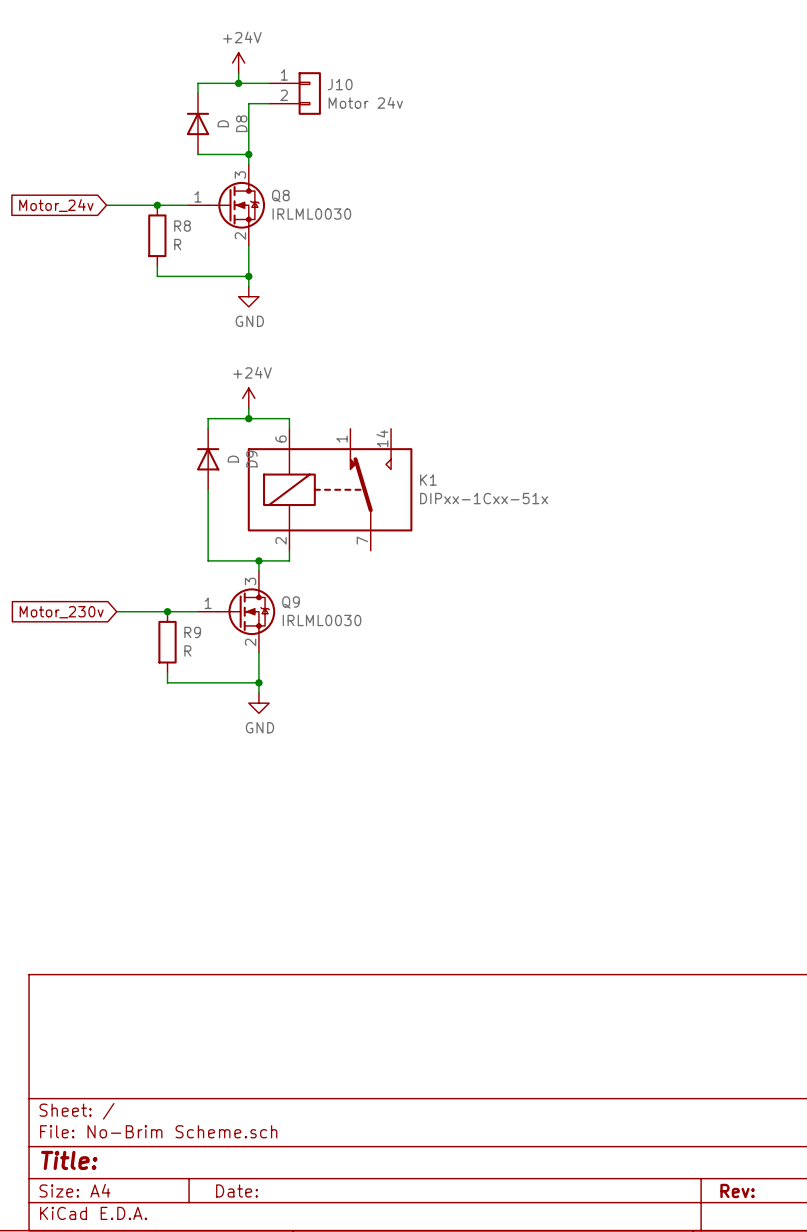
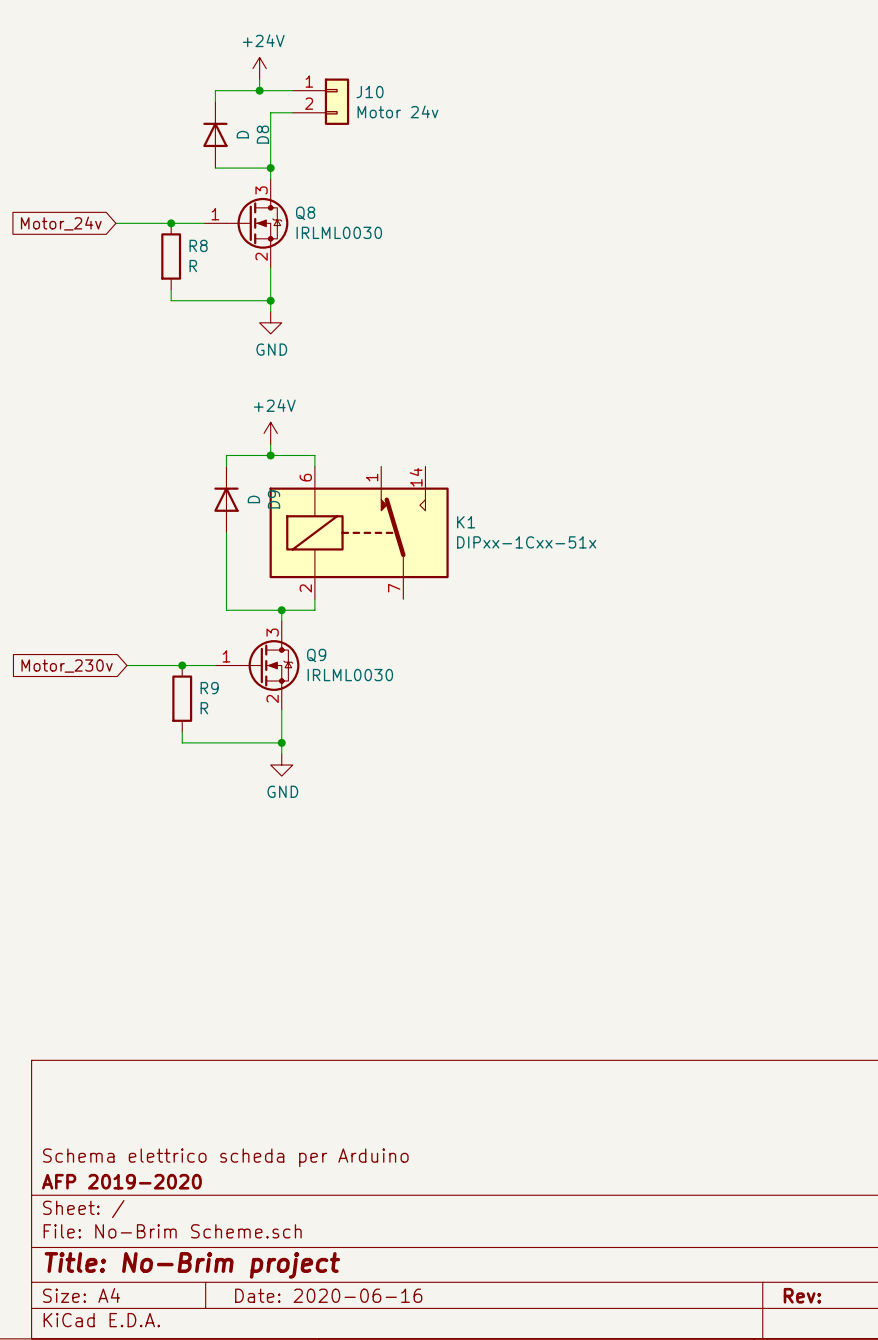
title block: none -> Schema elettrico scheda per Arduino (225, 1157)
title block: none -> AFP 2019-2020 (121, 1181)
title block: Title: (69, 1160) -> Title: No-Brim project (192, 1265)
title block: Date: (236, 1190) -> Date: 2020-06-16 (328, 1295)

